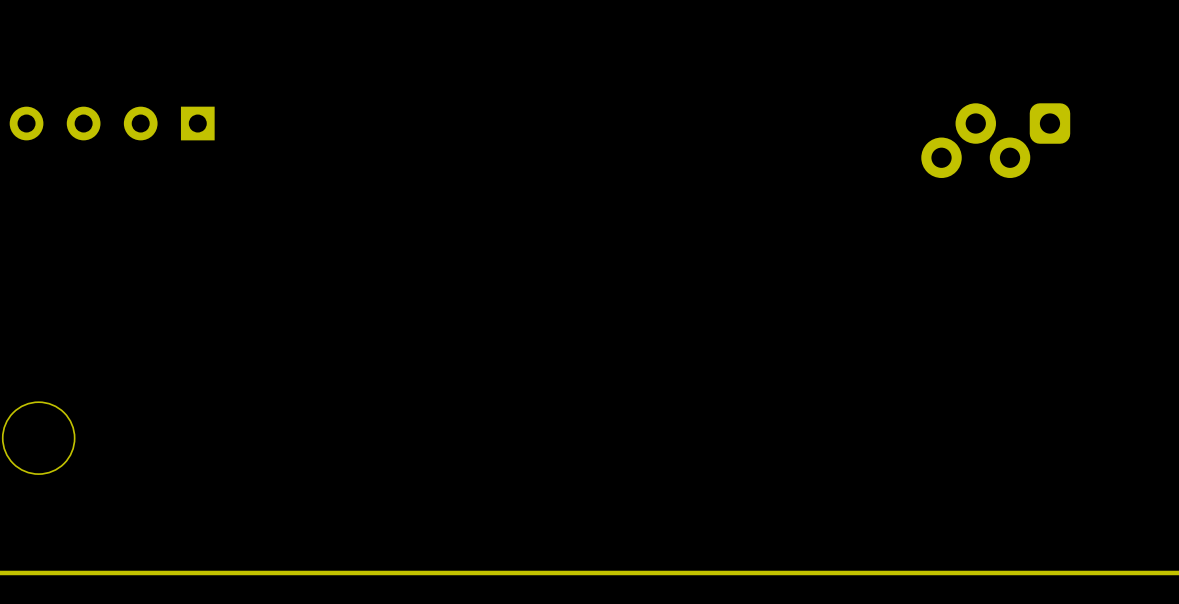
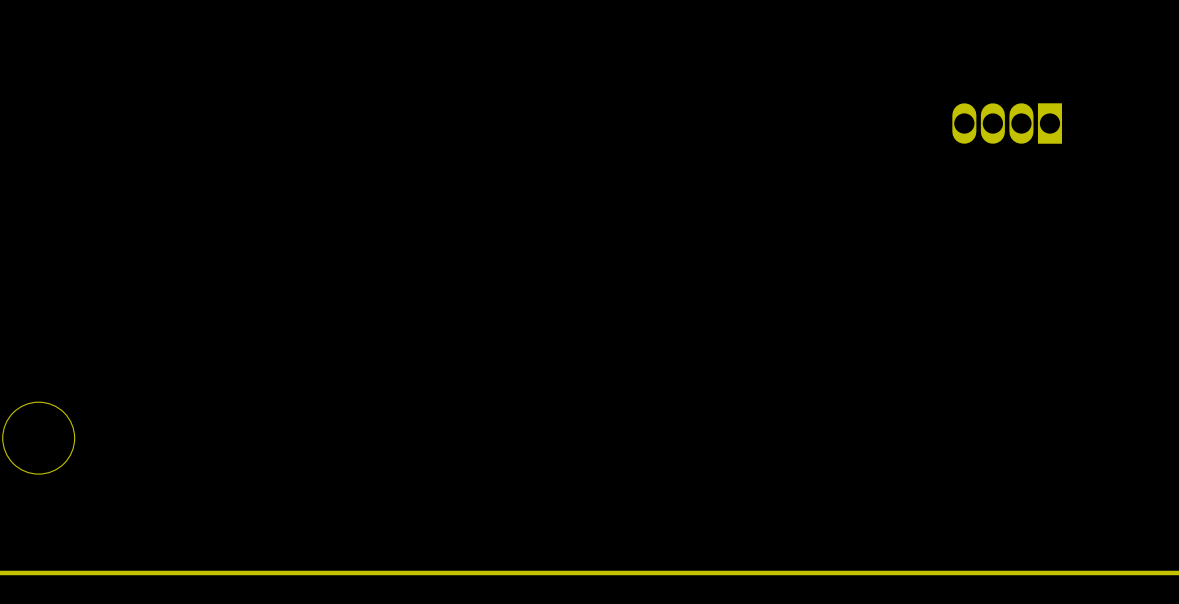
part footprint: [921, 103, 1071, 178] -> [952, 103, 1063, 144]
part: (112, 123) -> none

